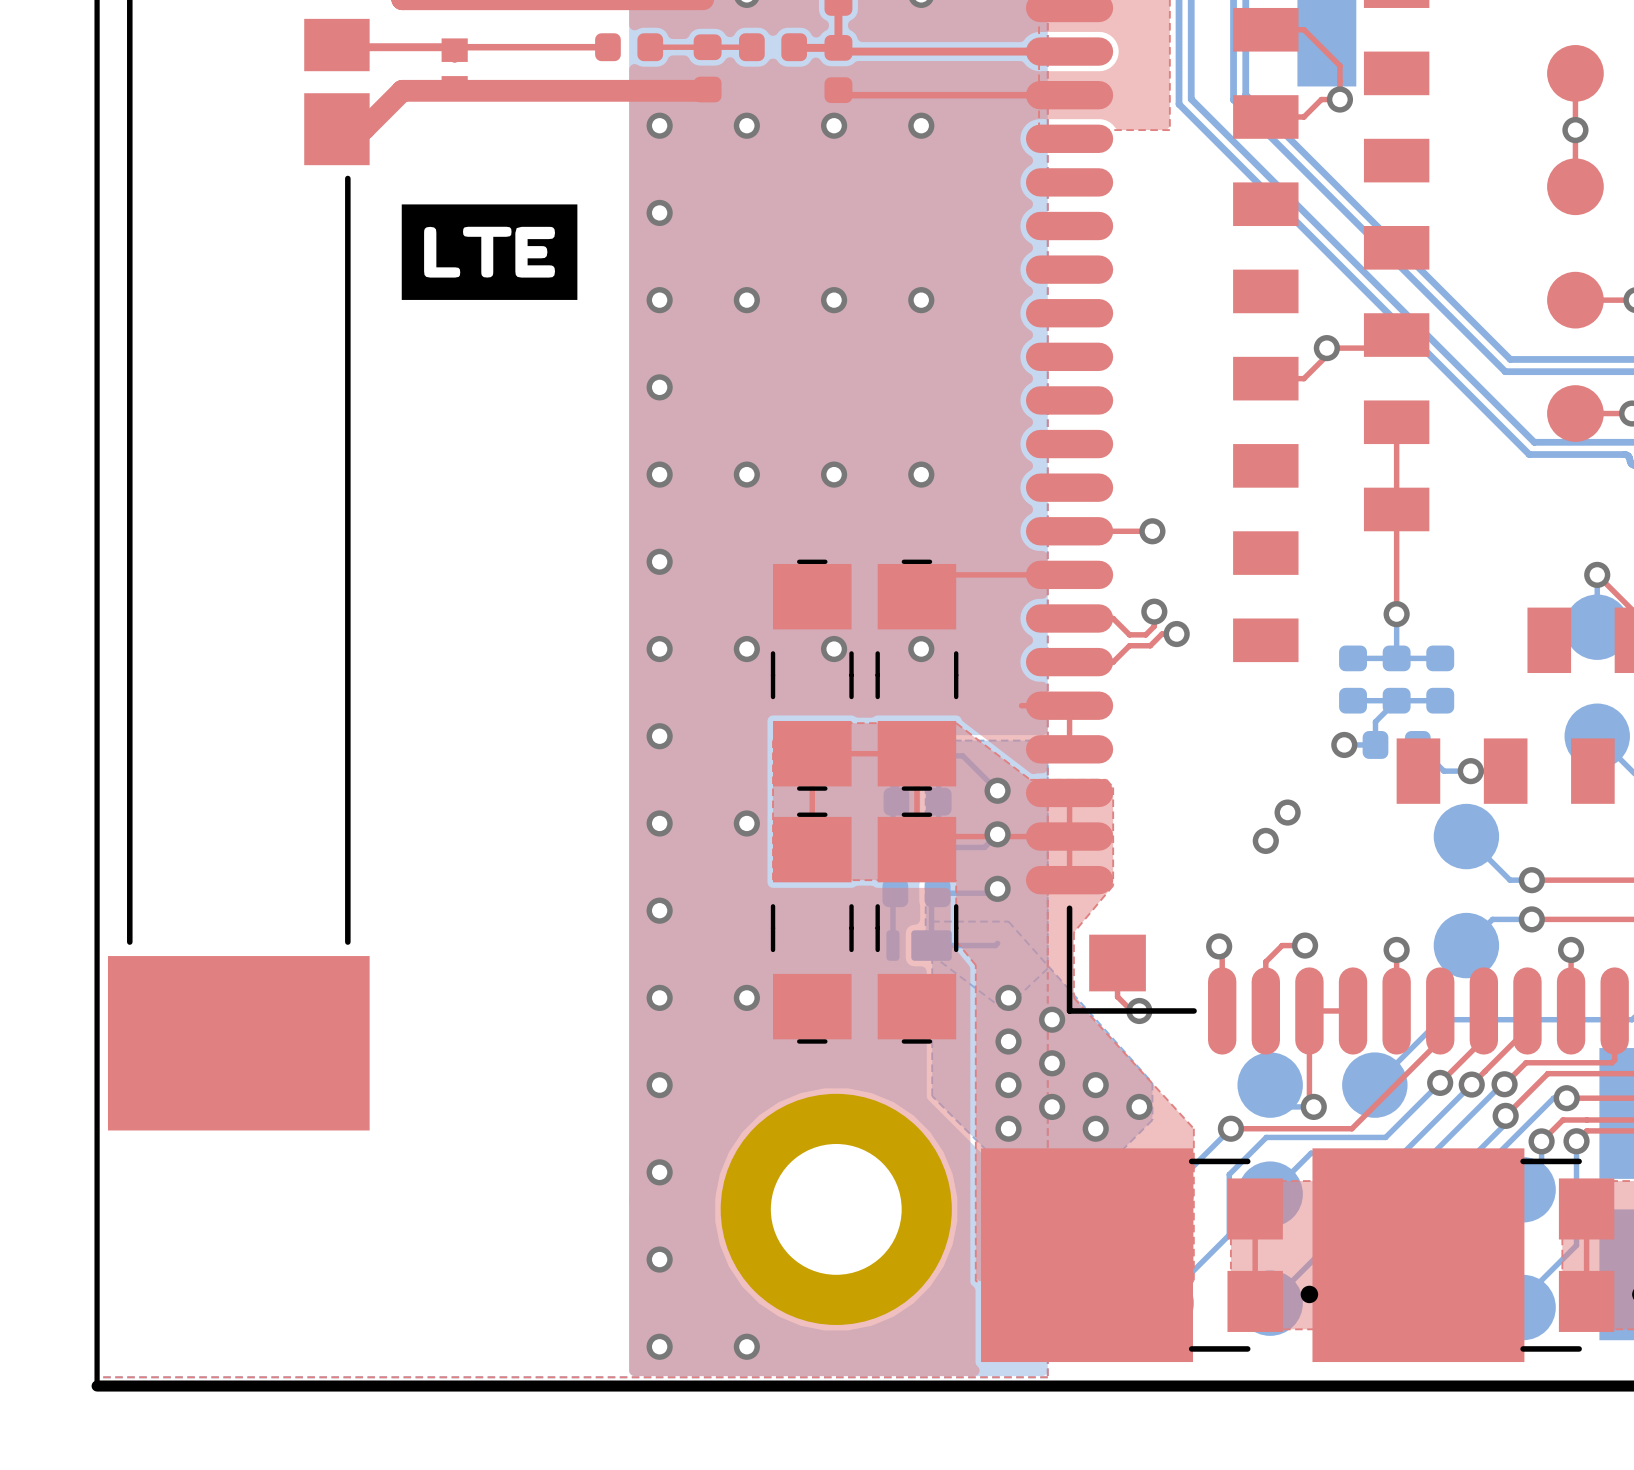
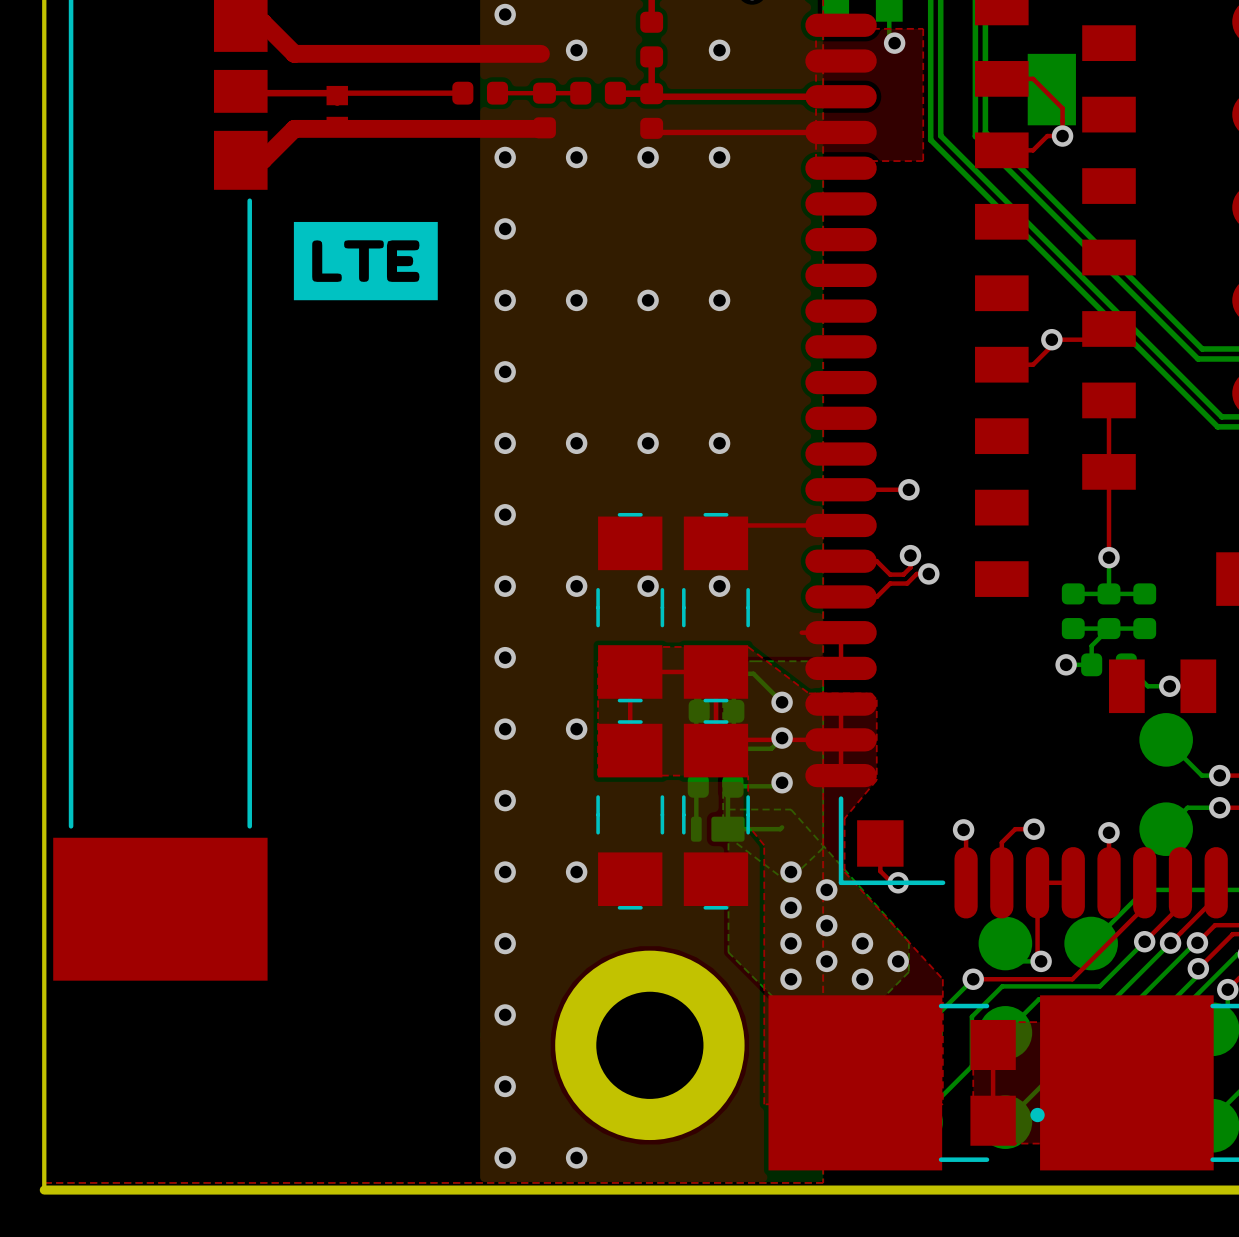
via: (1287, 812) -> none
via: (1265, 840) -> none

